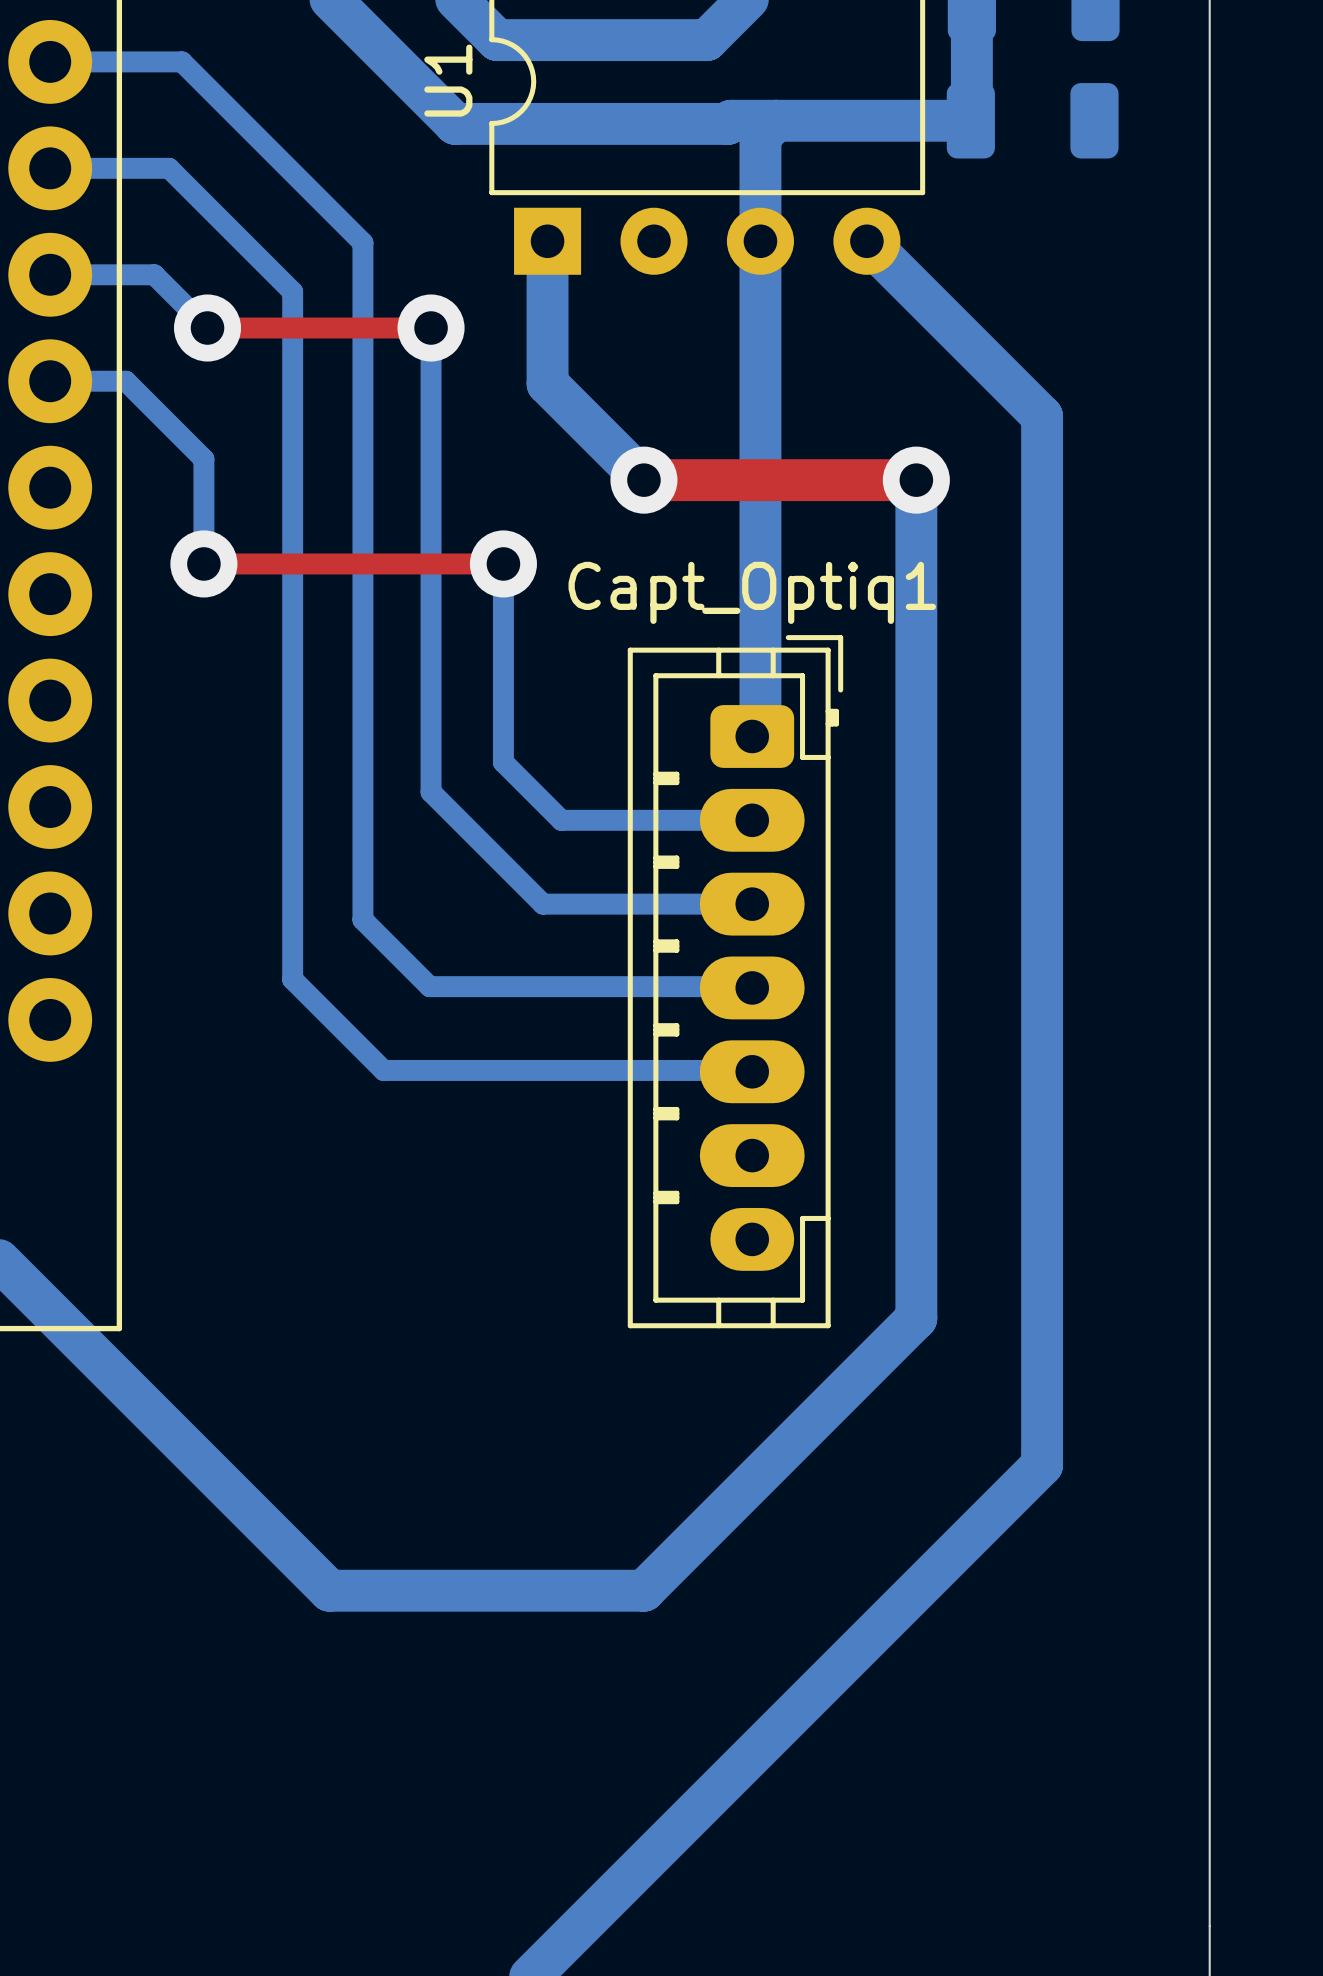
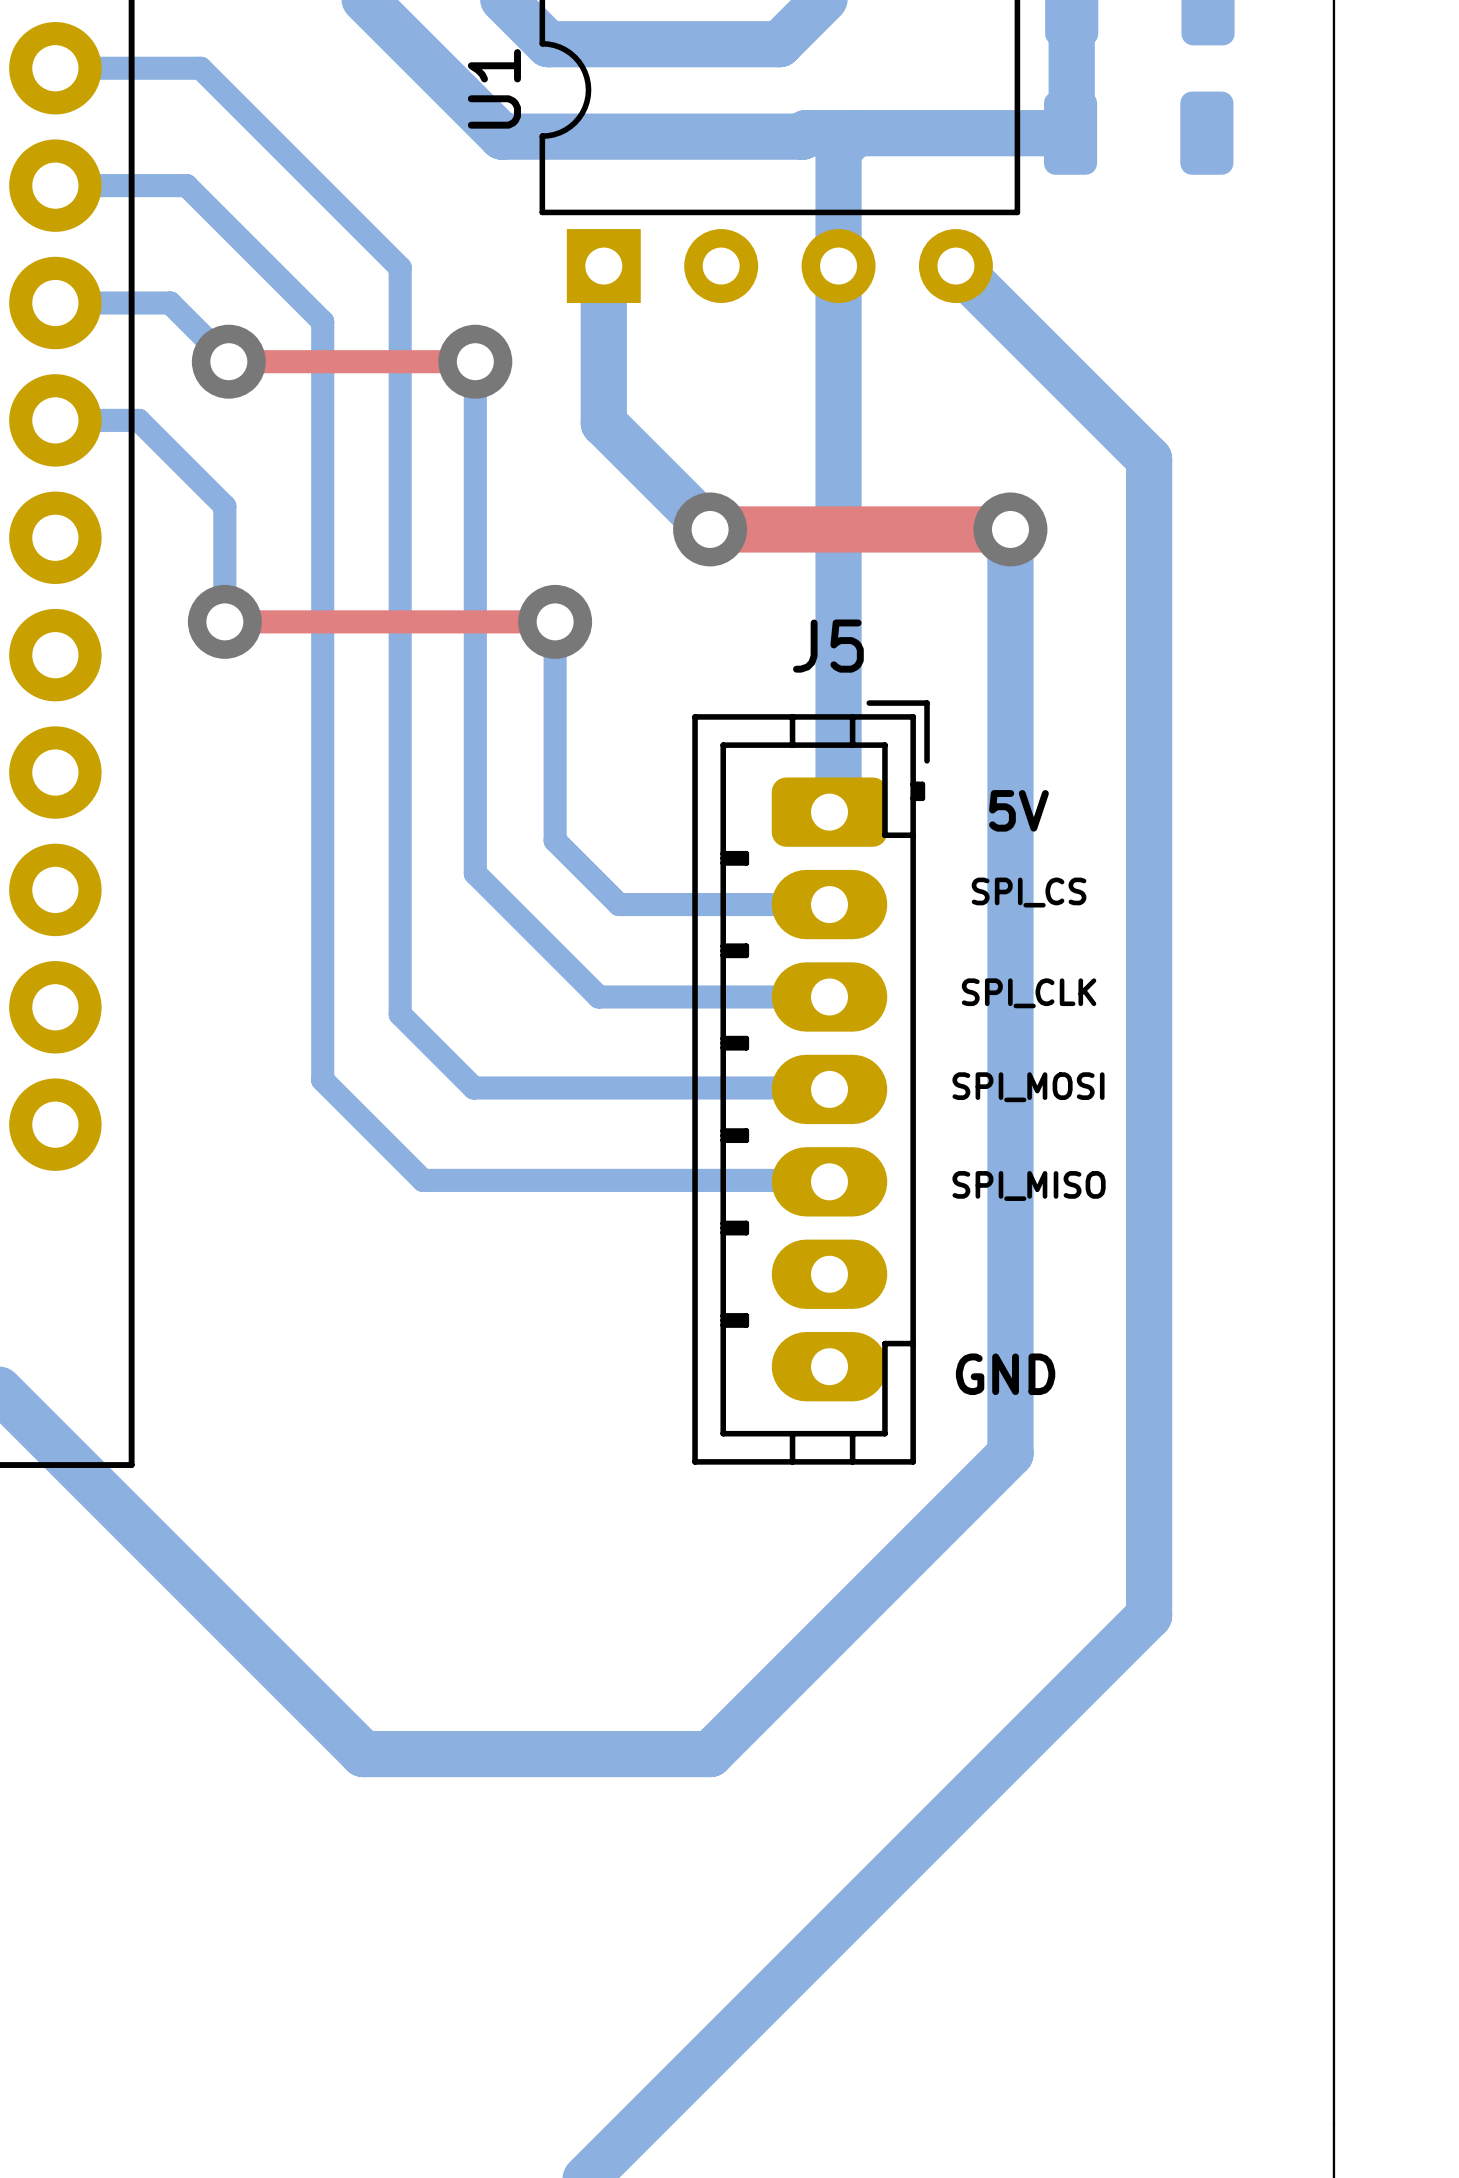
text: none -> 5V (1018, 810)
text: none -> SPI_CS (1029, 892)
text: none -> SPI_CLK (1029, 993)
Capt_Optiq1: (735, 981) -> none
J5: none -> (811, 1082)
text: none -> SPI_MOSI (1028, 1087)
text: none -> SPI_MISO (1029, 1186)
text: none -> GND (1005, 1374)

